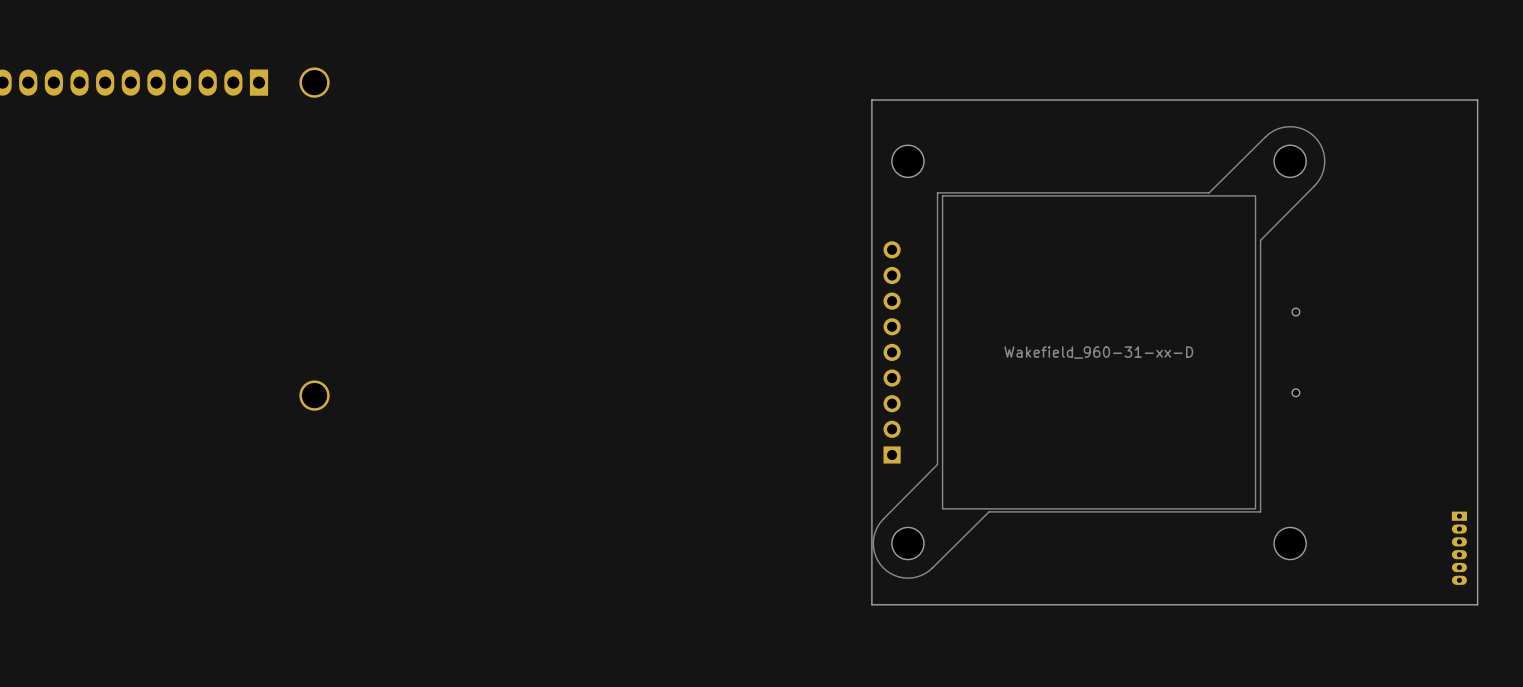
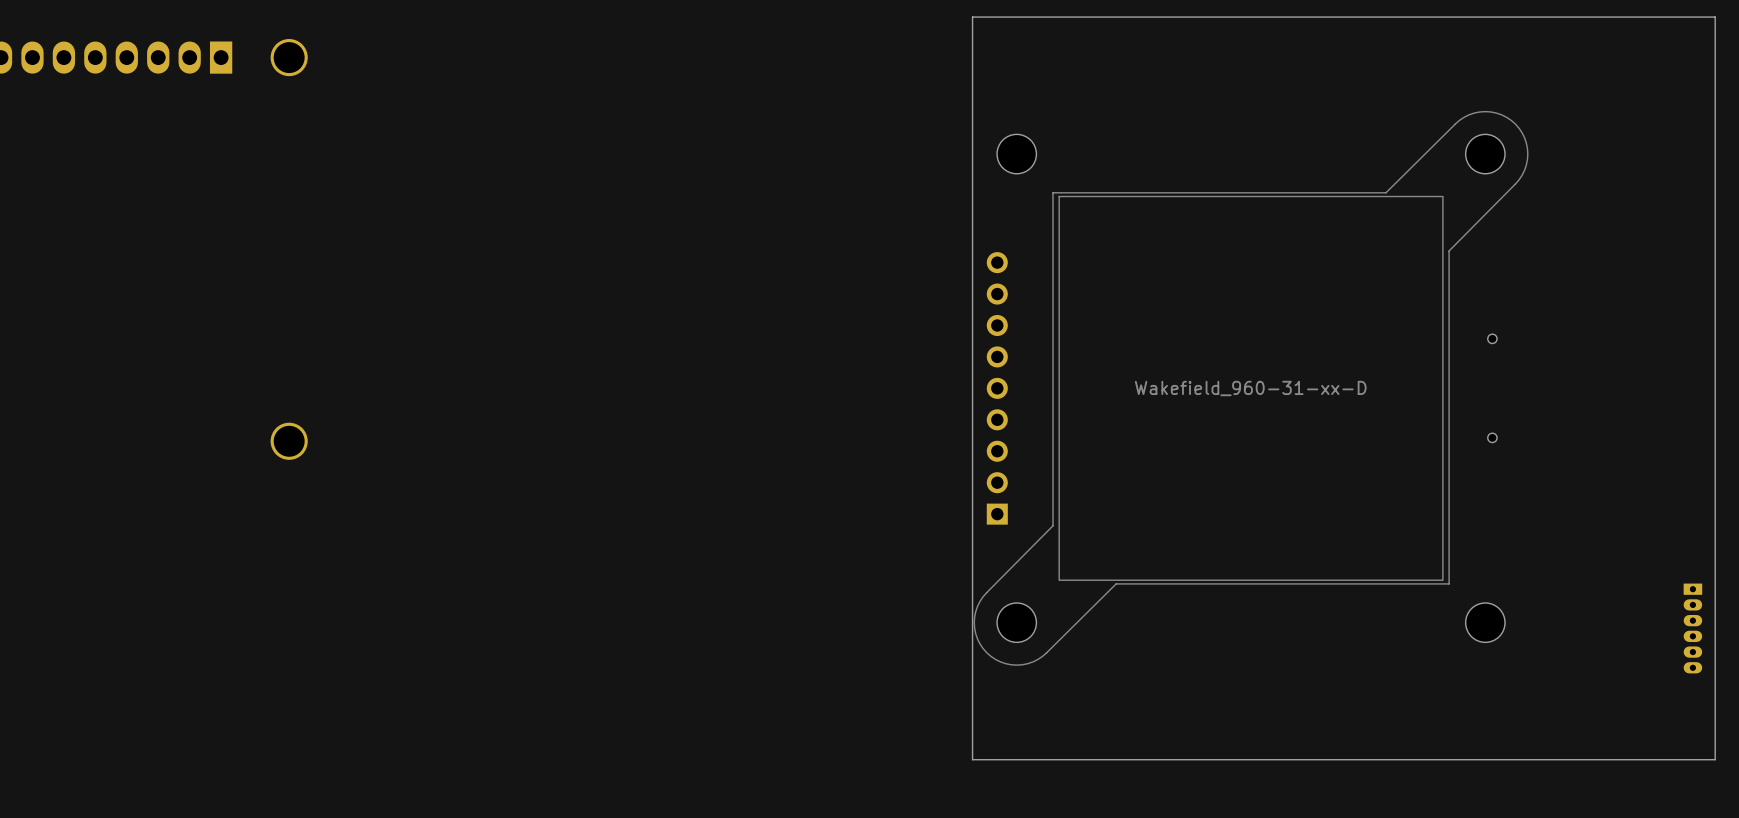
board edge: (1477, 100) (871, 100) -> (1715, 78) (1715, 17) (972, 17) (972, 78)
board edge: (1477, 604) (871, 604) -> (1715, 697) (1715, 759) (972, 759) (972, 697)

